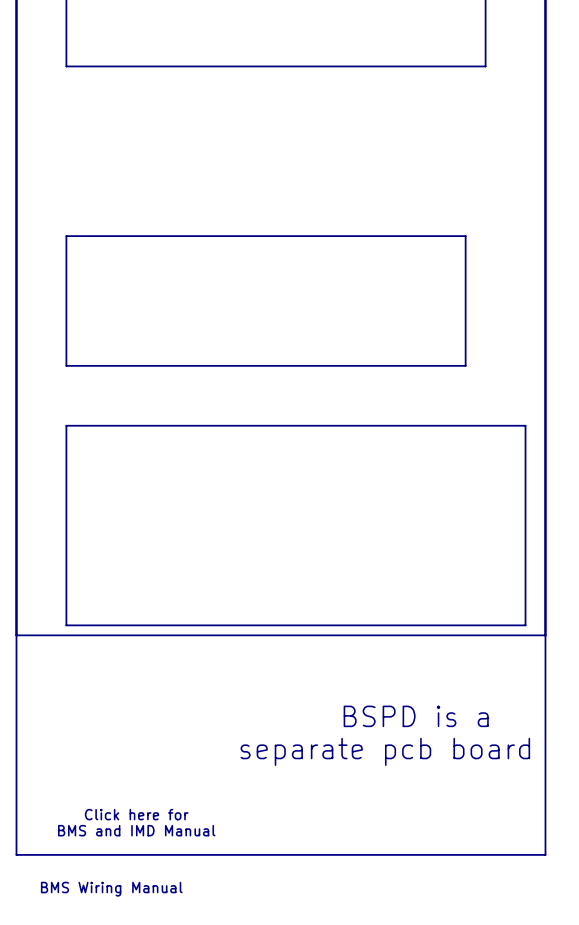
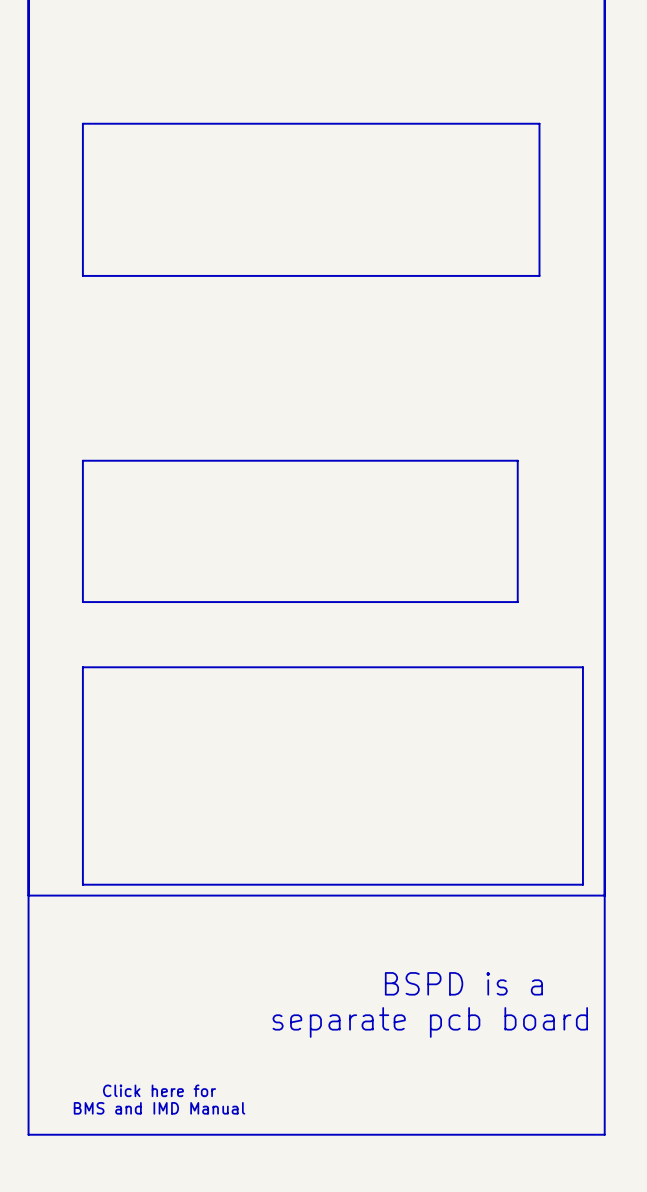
text: BMS Wiring Manual (111, 889) -> none

